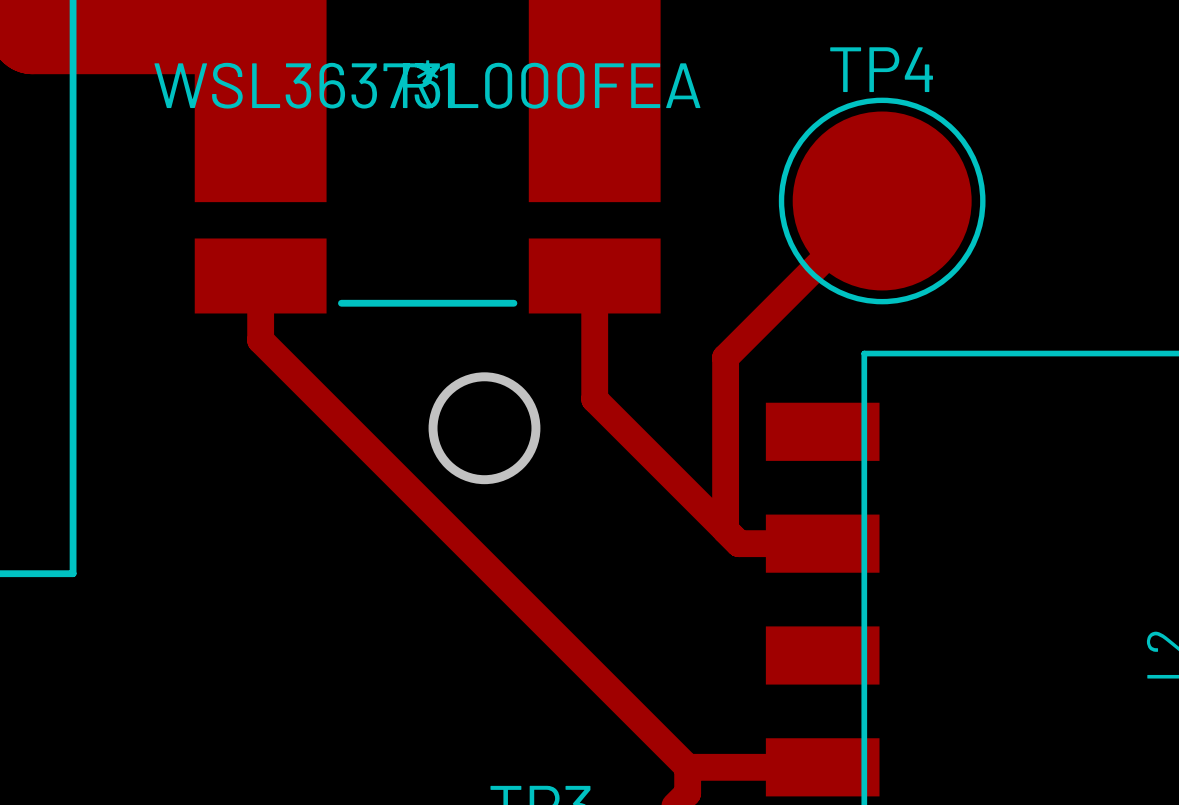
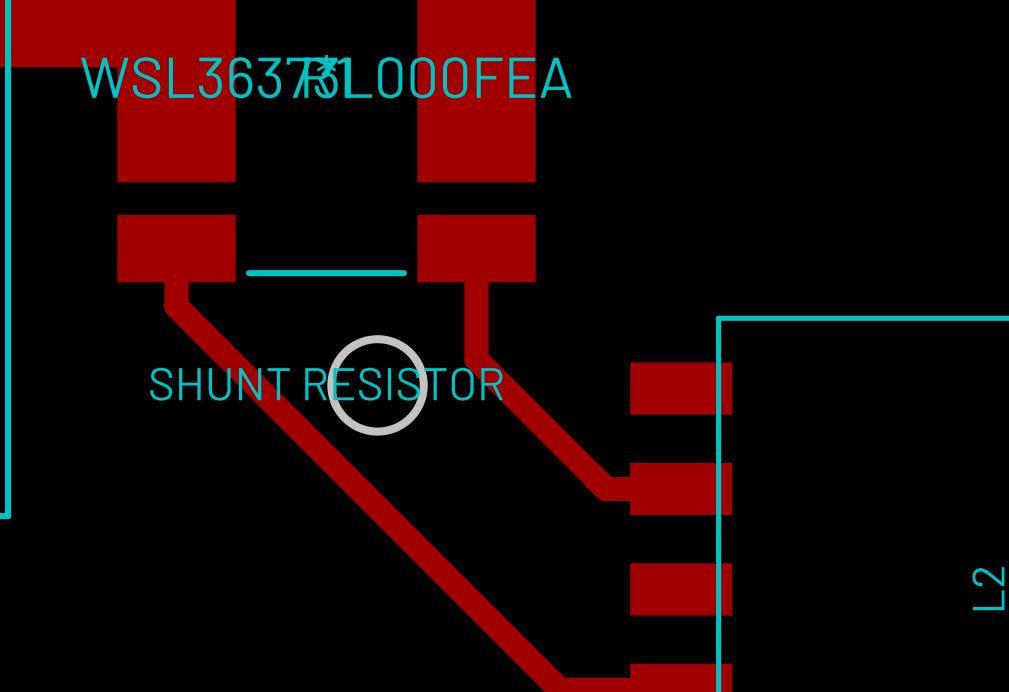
top track: (882, 200) (725, 357) (725, 530) -> none
TP4: (882, 200) -> none
text: none -> SHUNT RESISTOR (326, 384)

